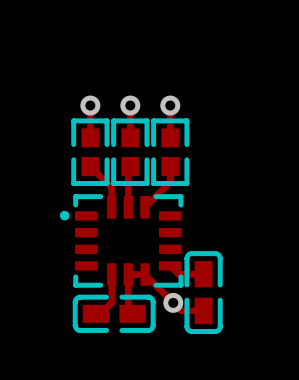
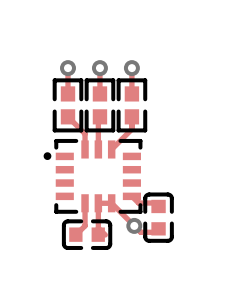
part footprint: [184, 251, 223, 335] -> [143, 192, 174, 243]
part footprint: [72, 294, 156, 333] -> [61, 219, 113, 250]

